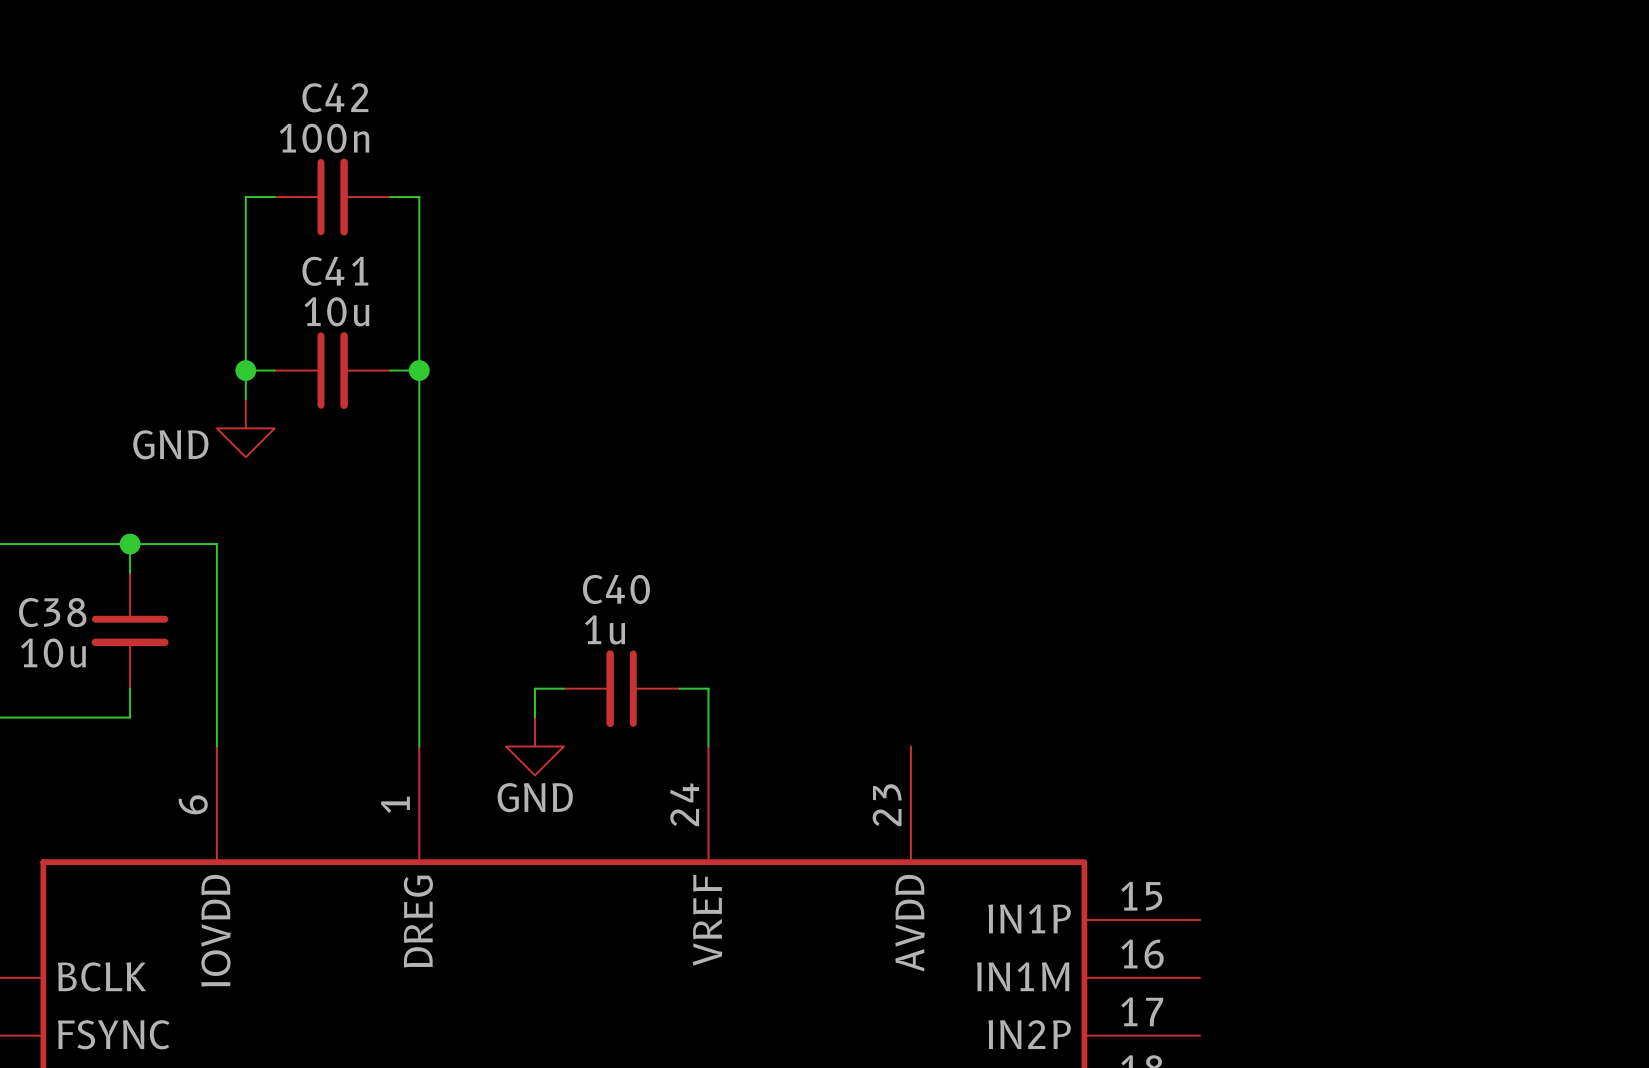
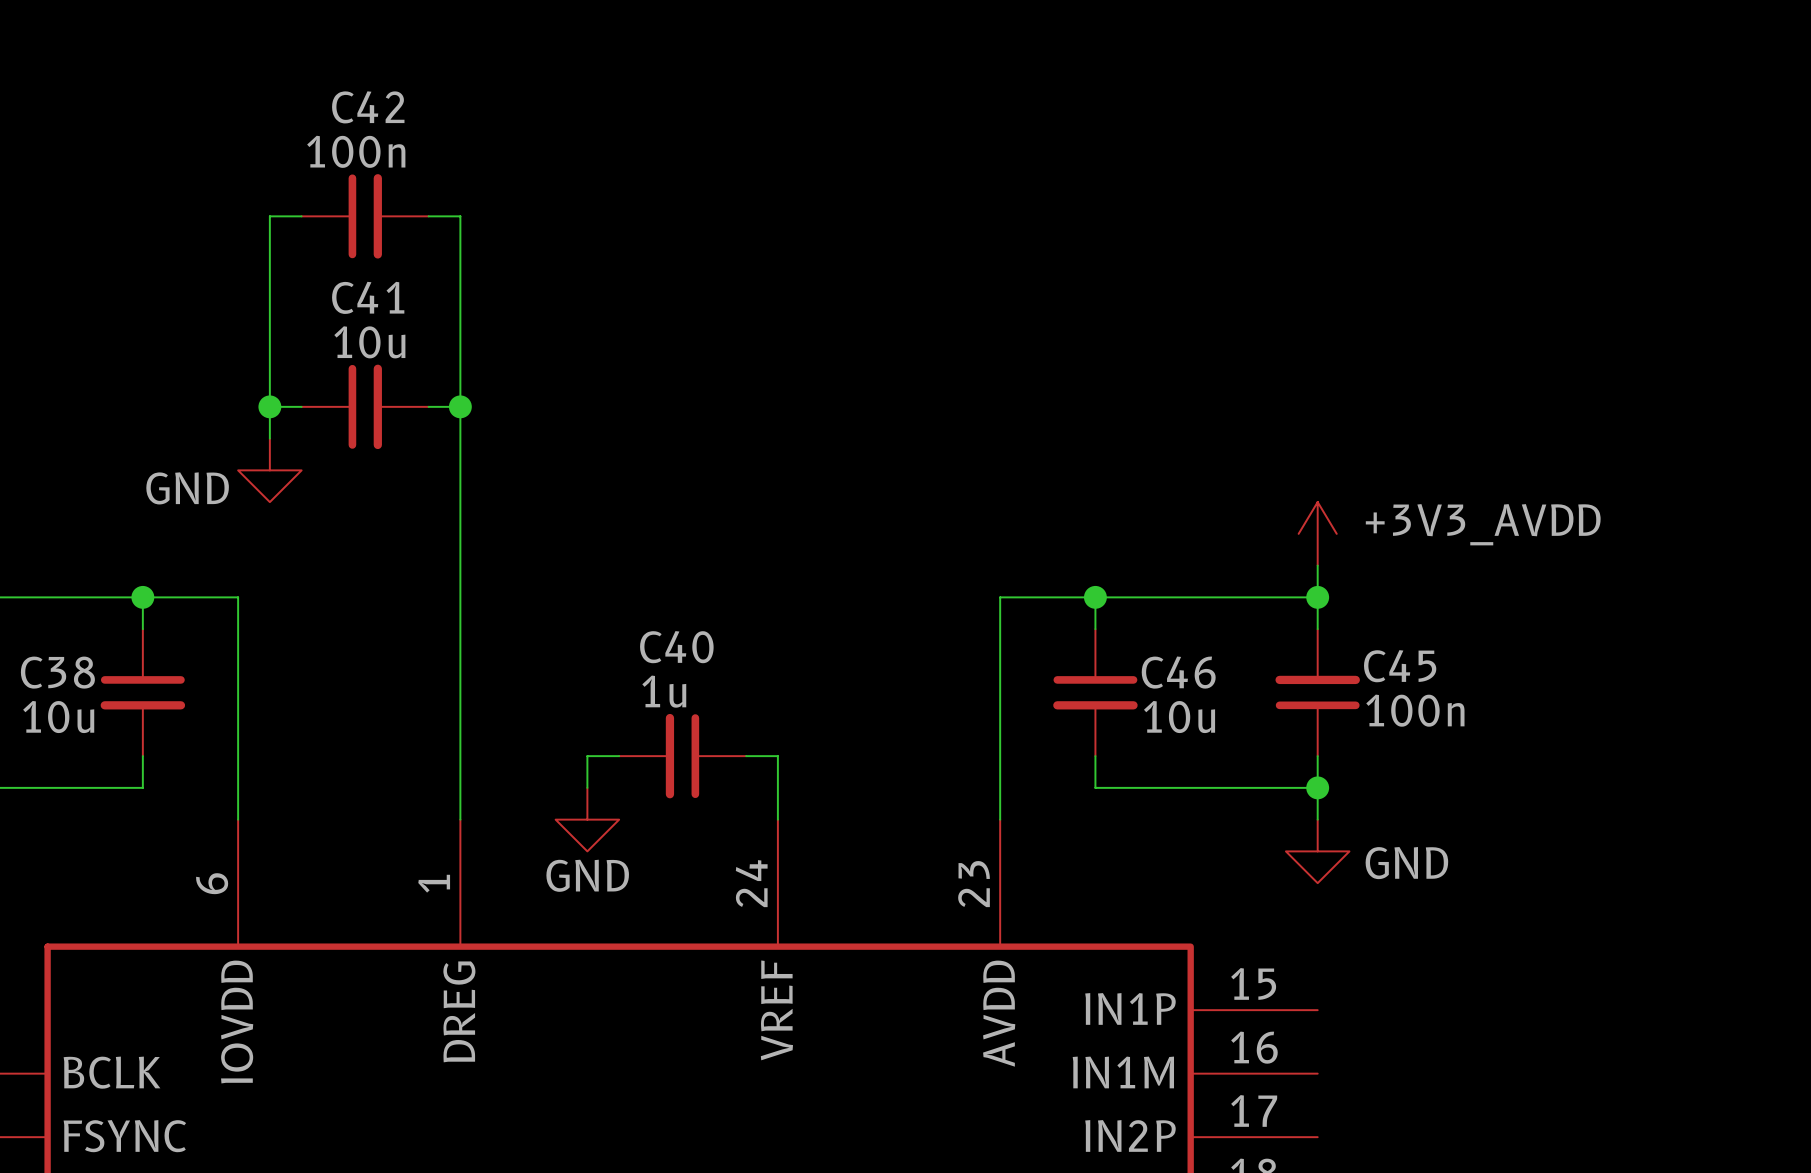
power symbol: none -> +3V3_AVDD (1317, 533)
wire: none -> (1317, 565) (1317, 629)
wire: none -> (1095, 597) (1095, 629)
junction: none -> (1095, 597)
wire: none -> (1317, 597) (1000, 597) (1000, 819)
junction: none -> (1317, 597)
C46: none -> 10u (1095, 692)
C45: none -> 100n (1317, 692)
wire: none -> (1095, 756) (1095, 787) (1317, 787)
wire: none -> (1317, 756) (1317, 819)
junction: none -> (1317, 787)
power symbol: none -> GND (1317, 851)

